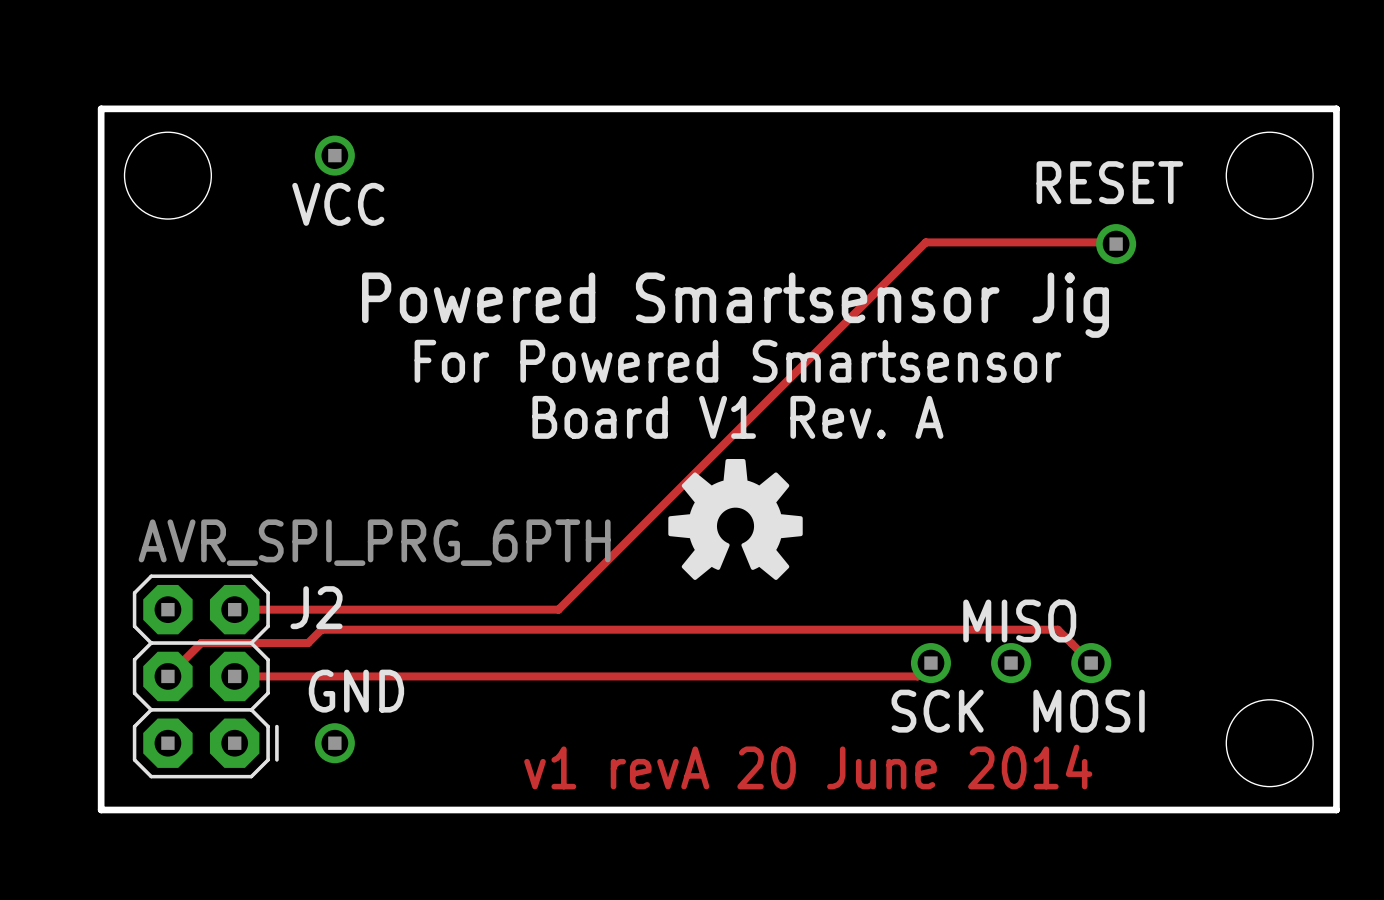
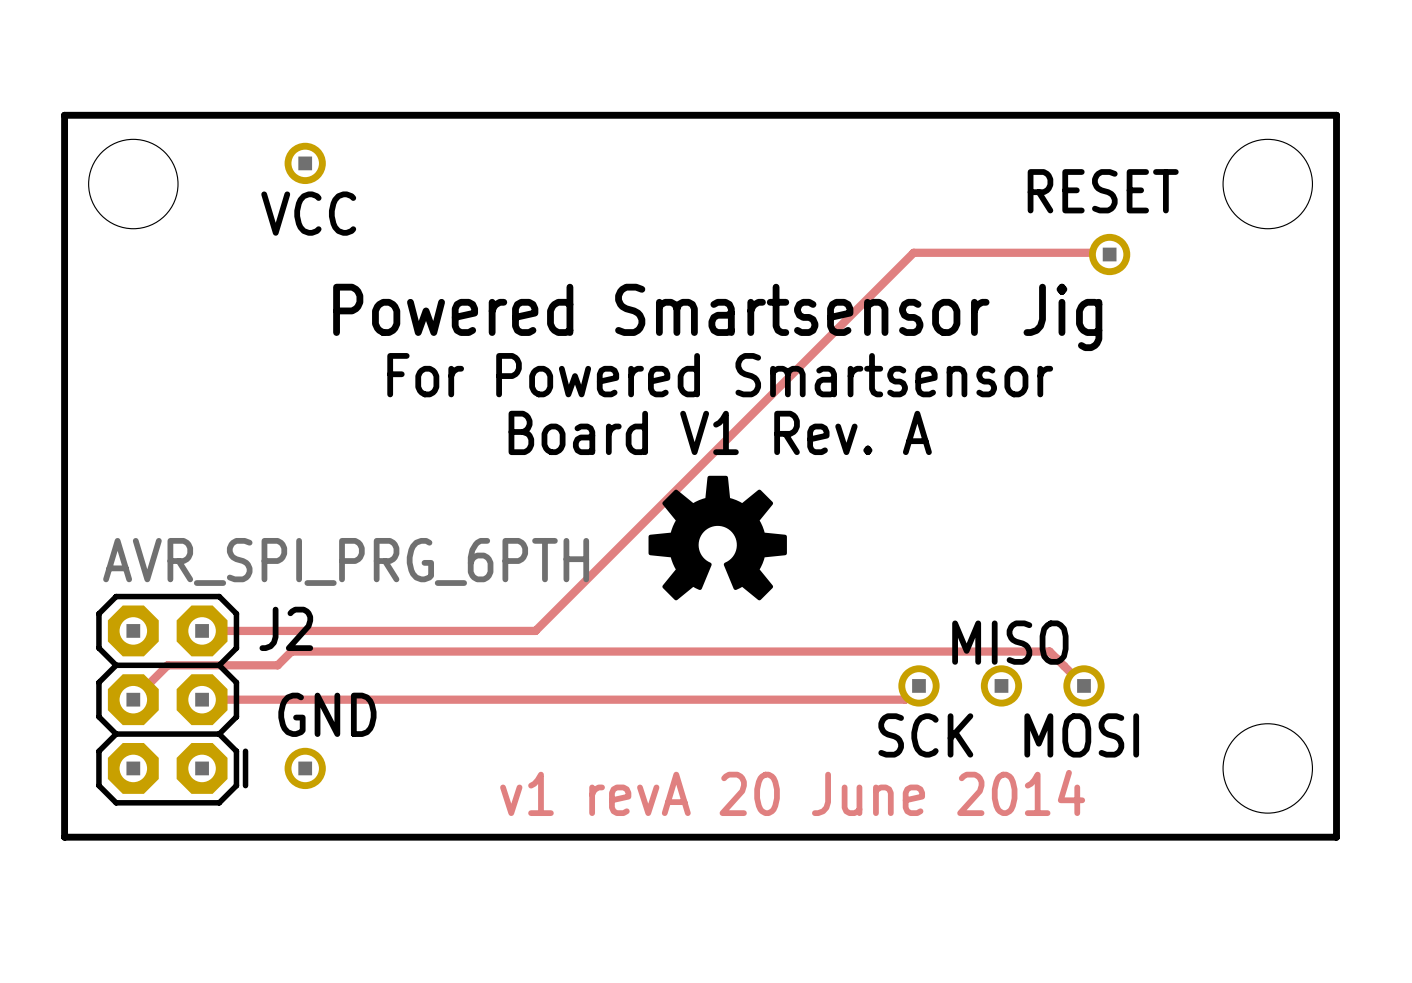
J2 footprint: [132, 574, 279, 779] -> [96, 593, 249, 806]

